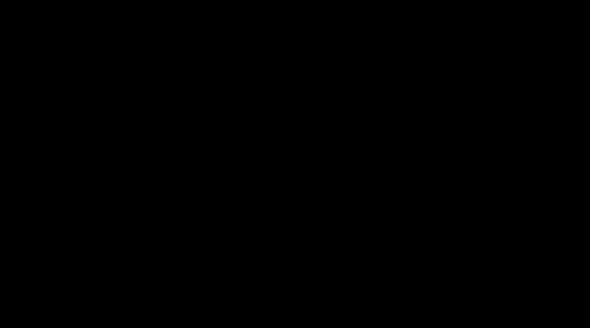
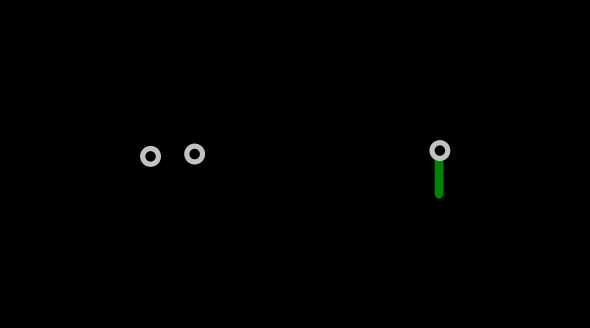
track: none -> (439, 150) (439, 194)
via: none -> (439, 150)
via: none -> (194, 154)
via: none -> (150, 156)

